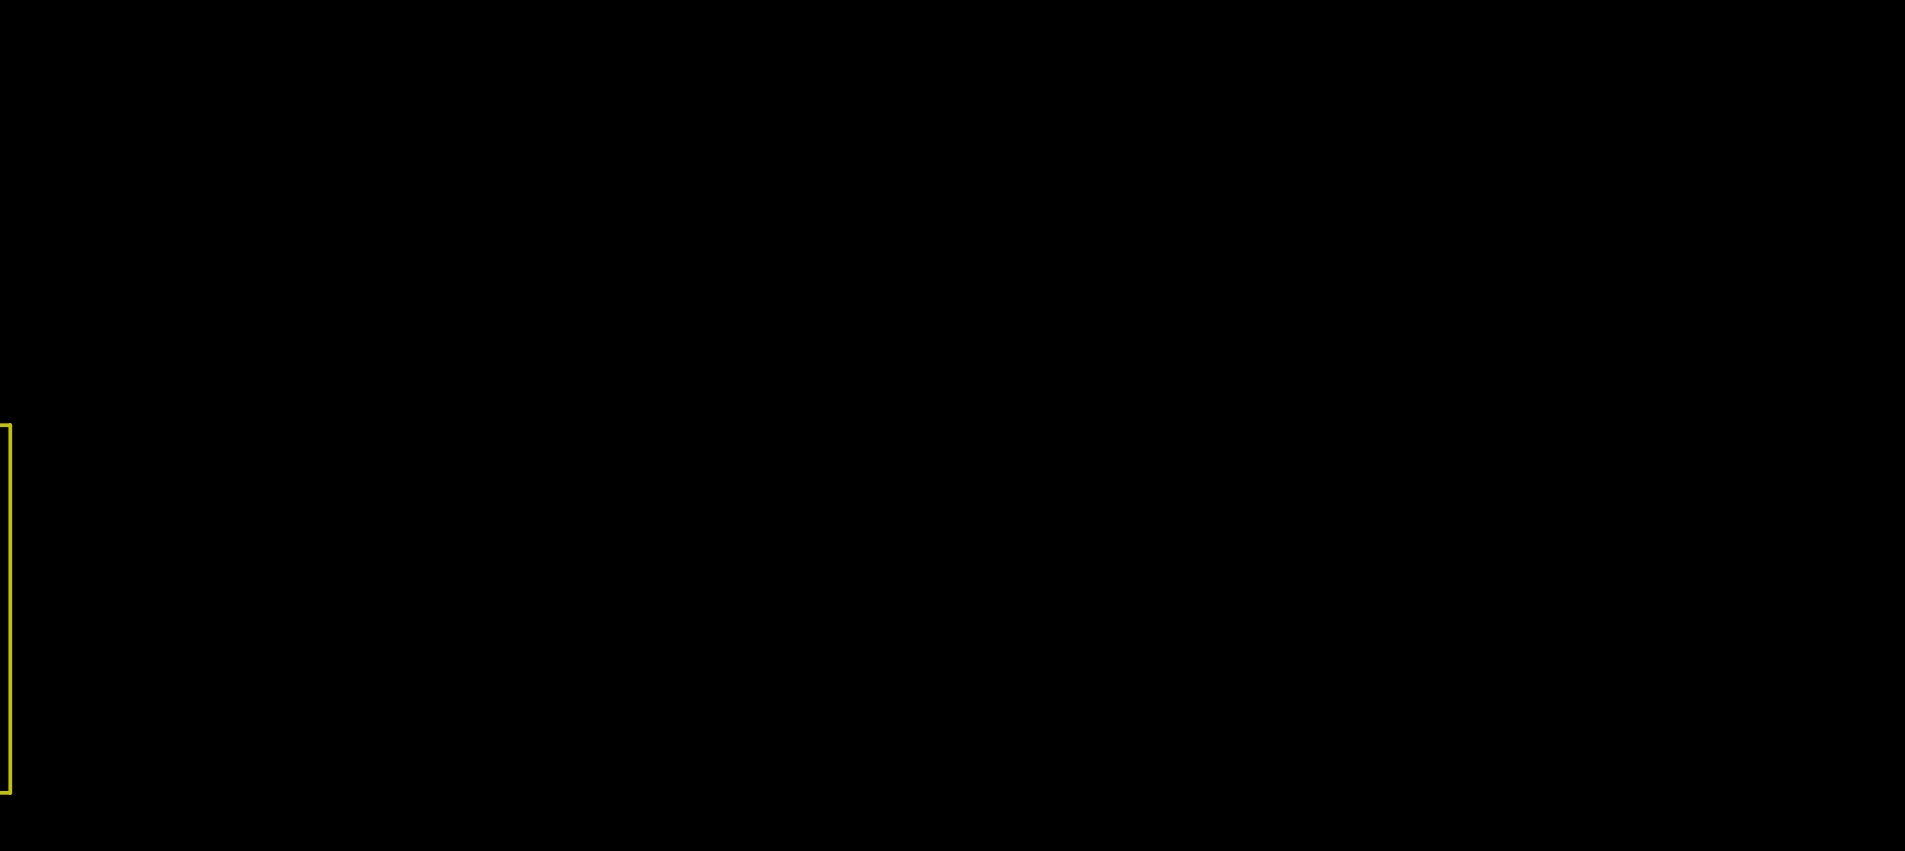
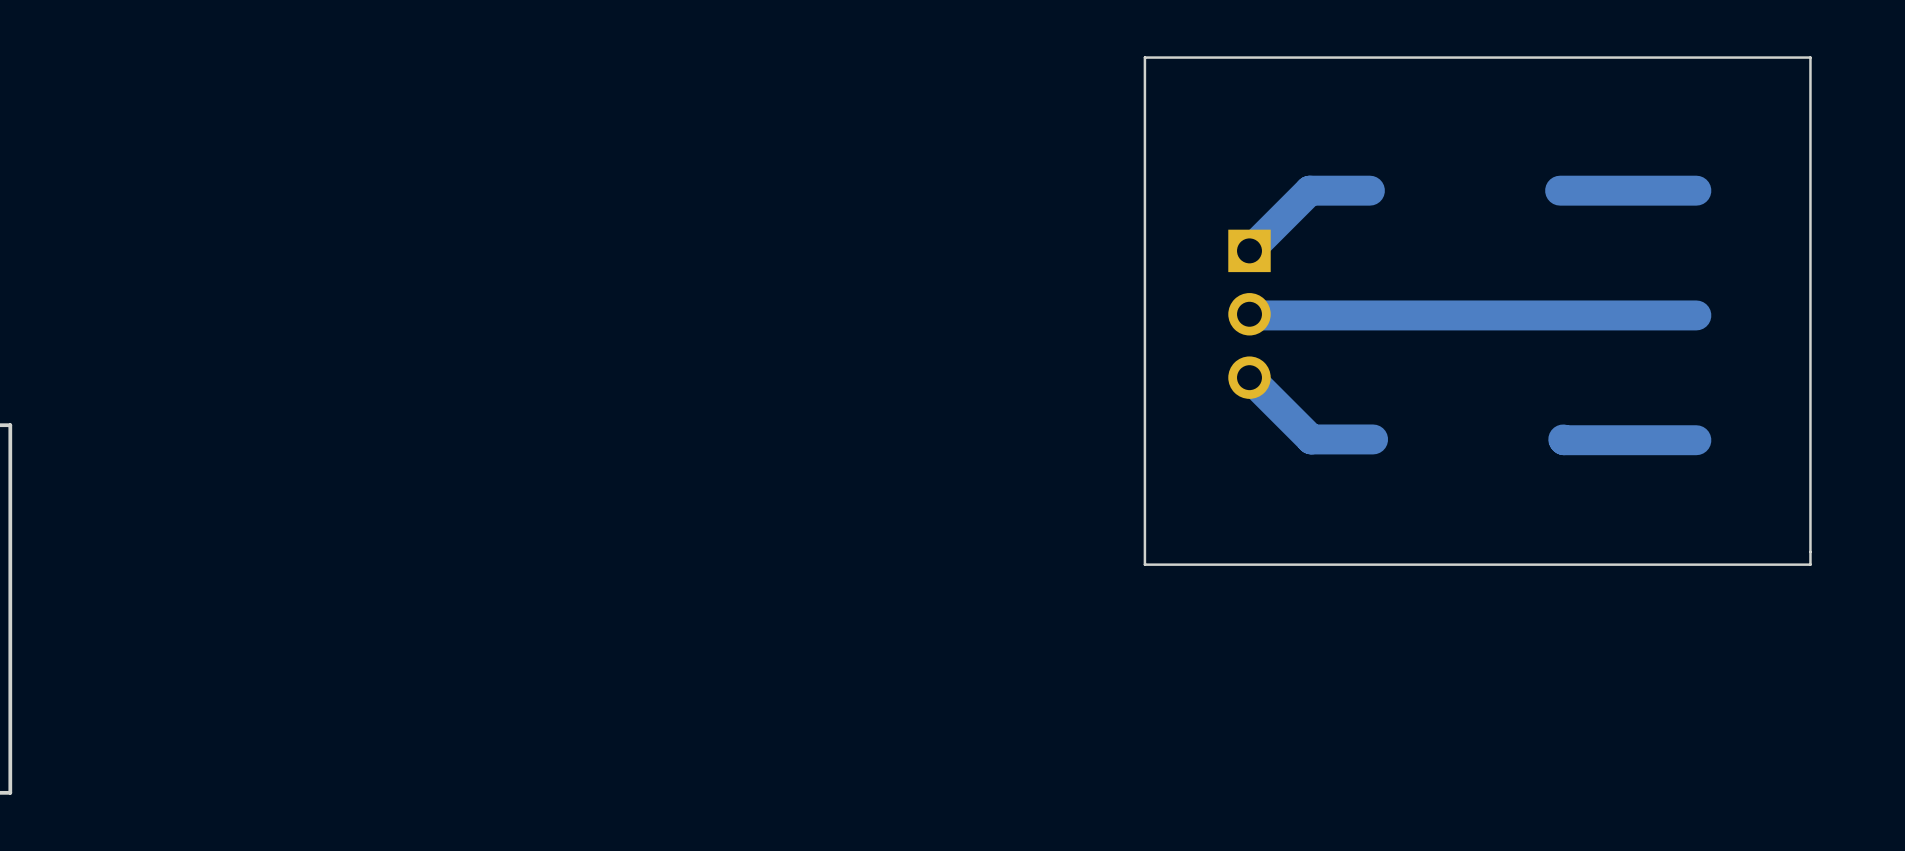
board edge: none -> (1810, 57) (1144, 57) (1144, 564) (1810, 564) (1810, 57)
track: none -> (1369, 190) (1309, 190) (1249, 250)
track: none -> (1696, 190) (1560, 190)
track: none -> (1249, 314) (1696, 315)
part: none -> (1249, 314)
track: none -> (1249, 377) (1311, 439) (1373, 439)
track: none -> (1563, 439) (1696, 440)

